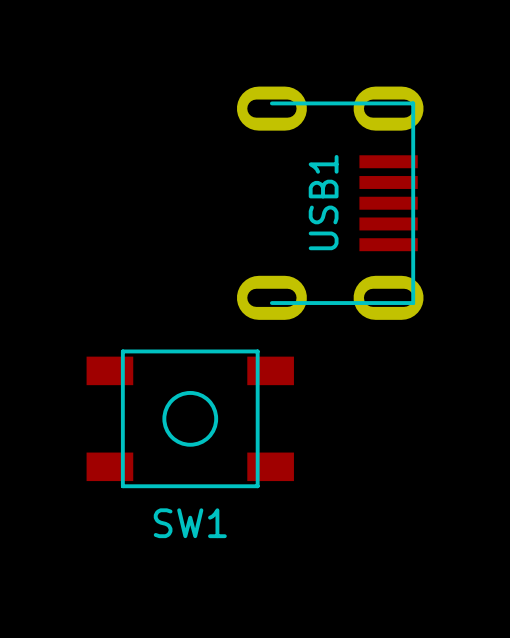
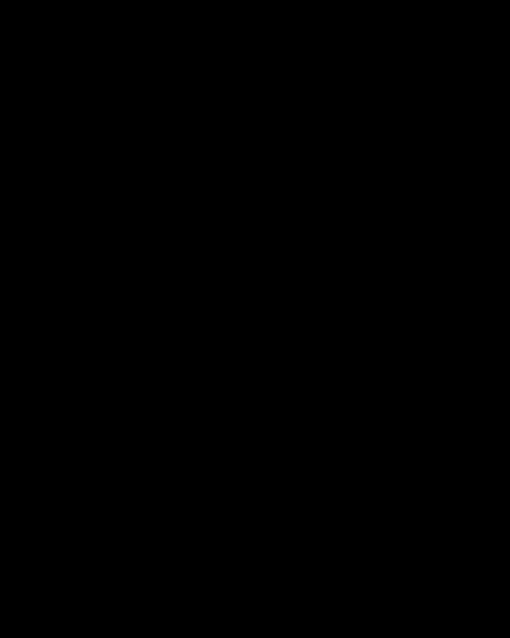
USB1: (330, 203) -> none
SW1: (190, 418) -> none

